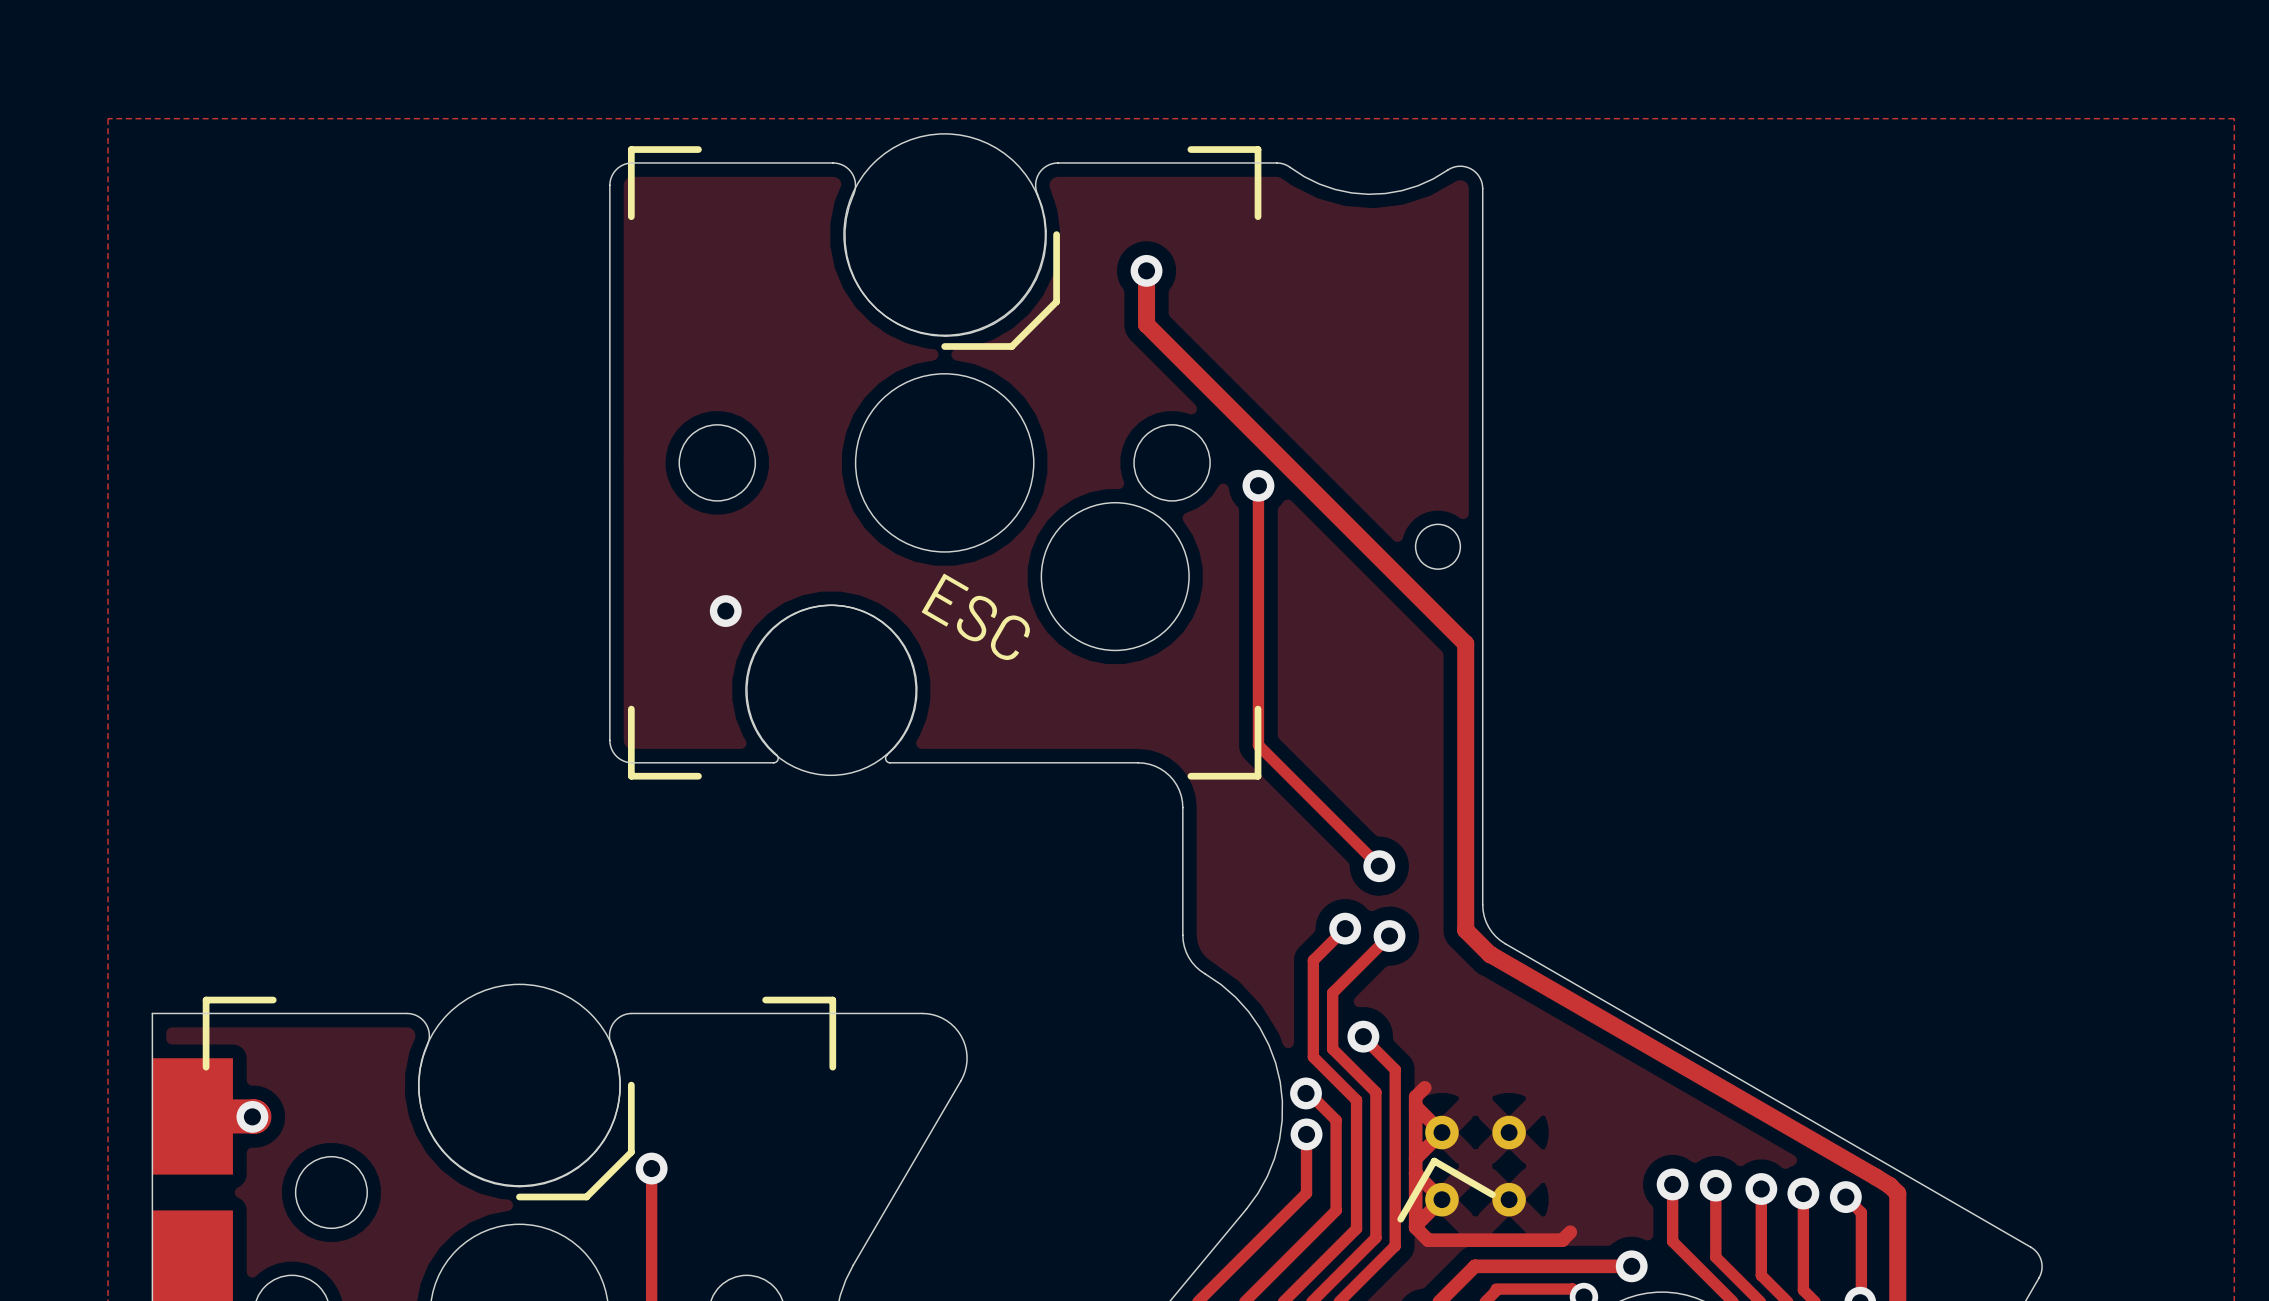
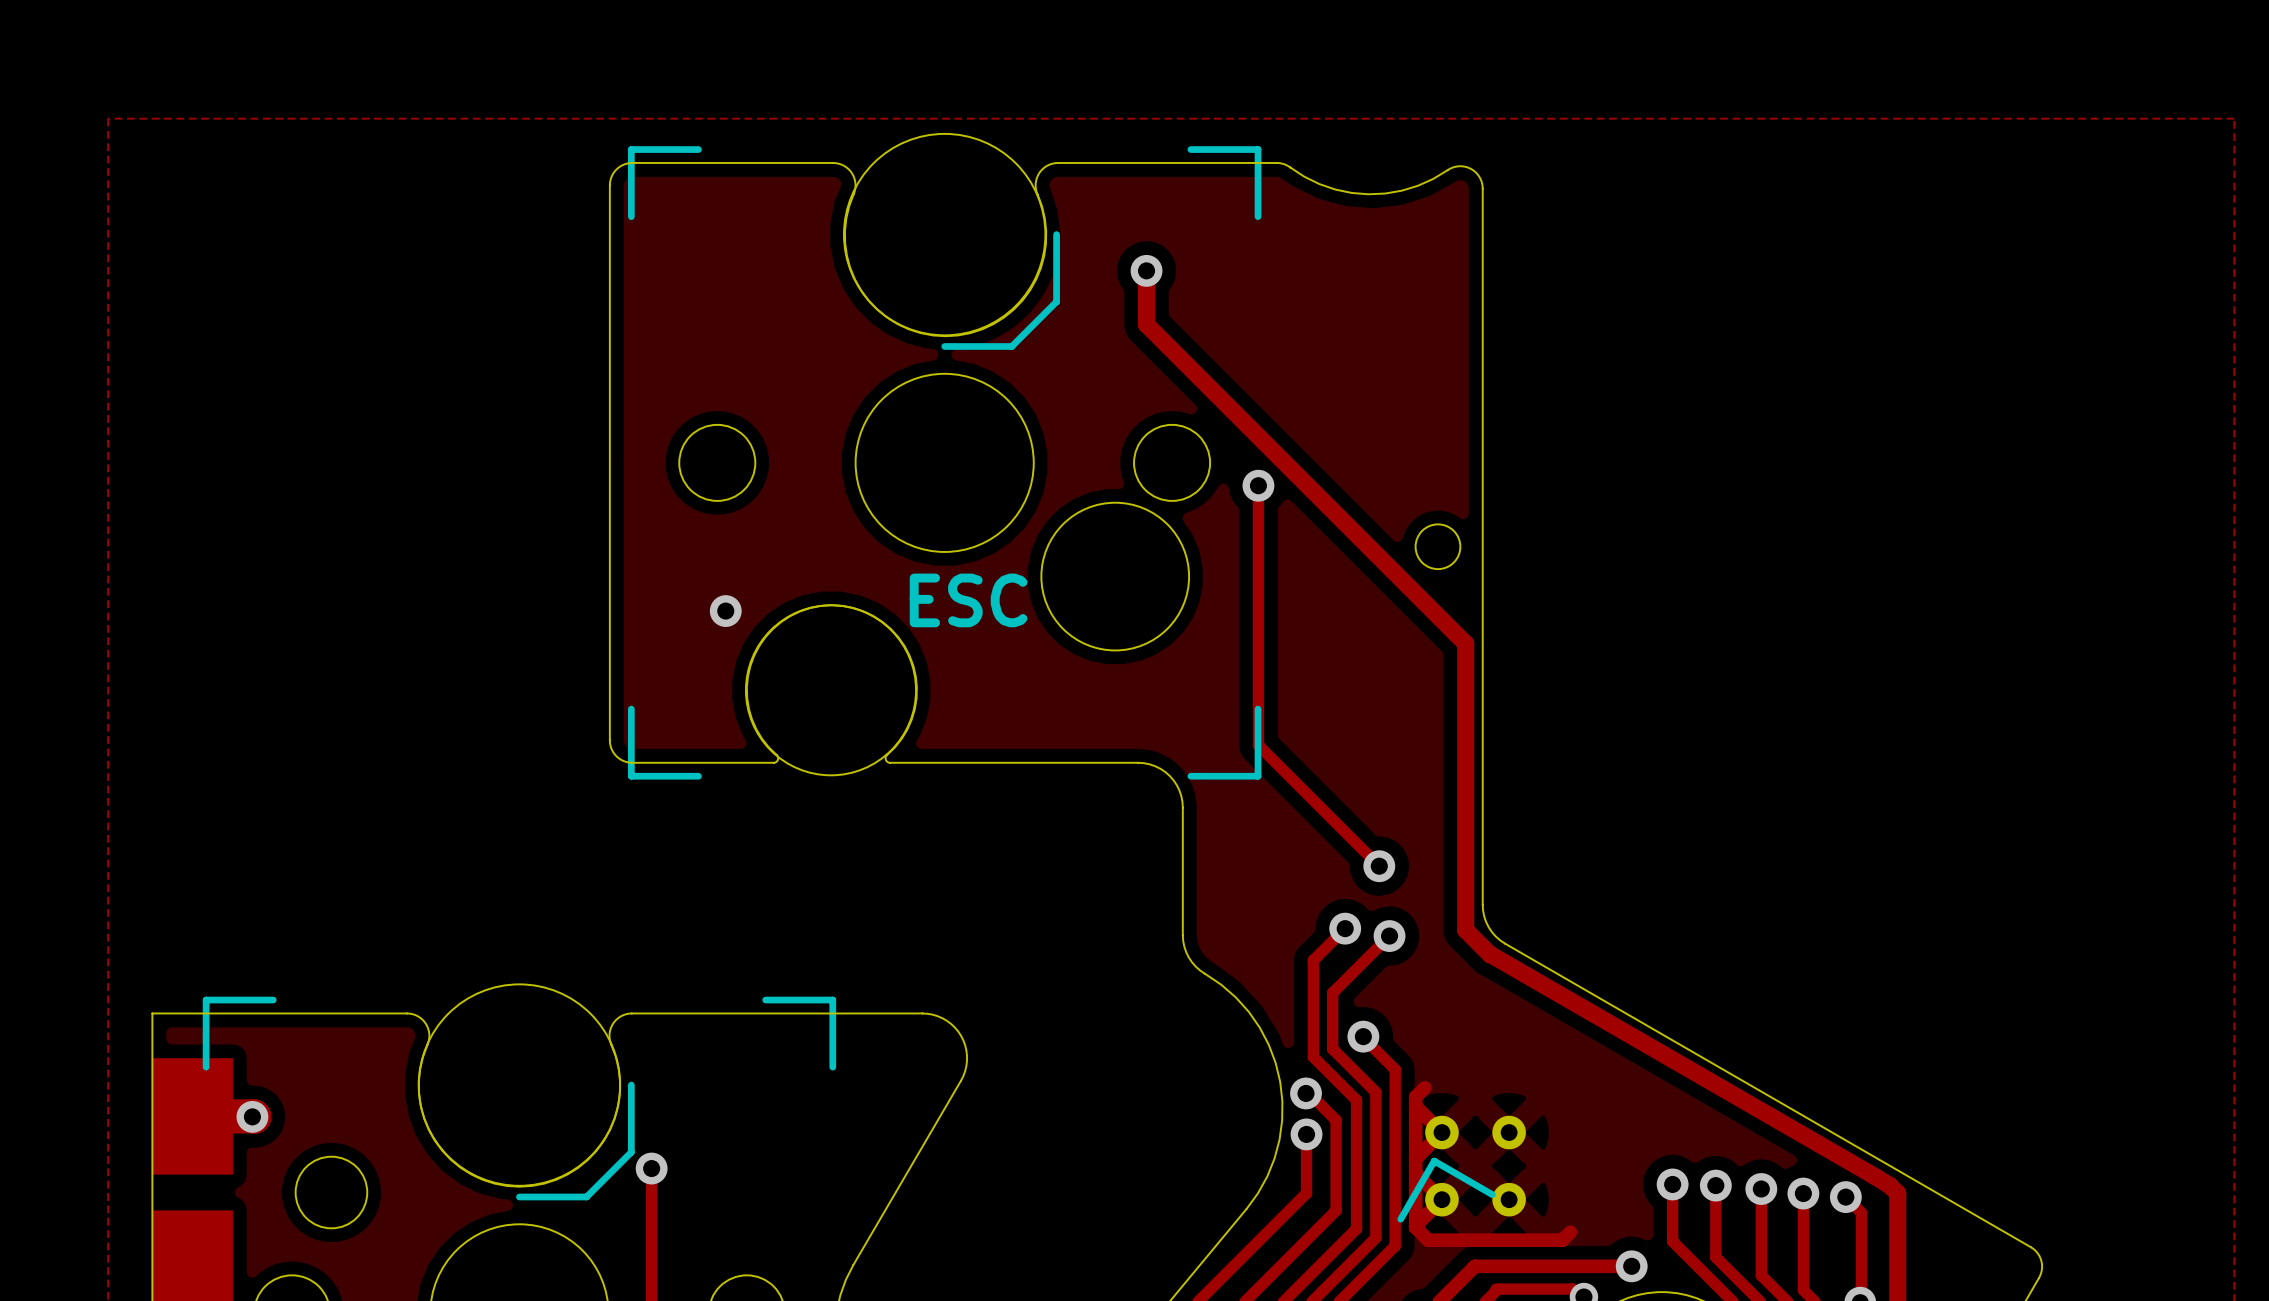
text rotation: 0° (975, 616) -> 30° counterclockwise (968, 600)

